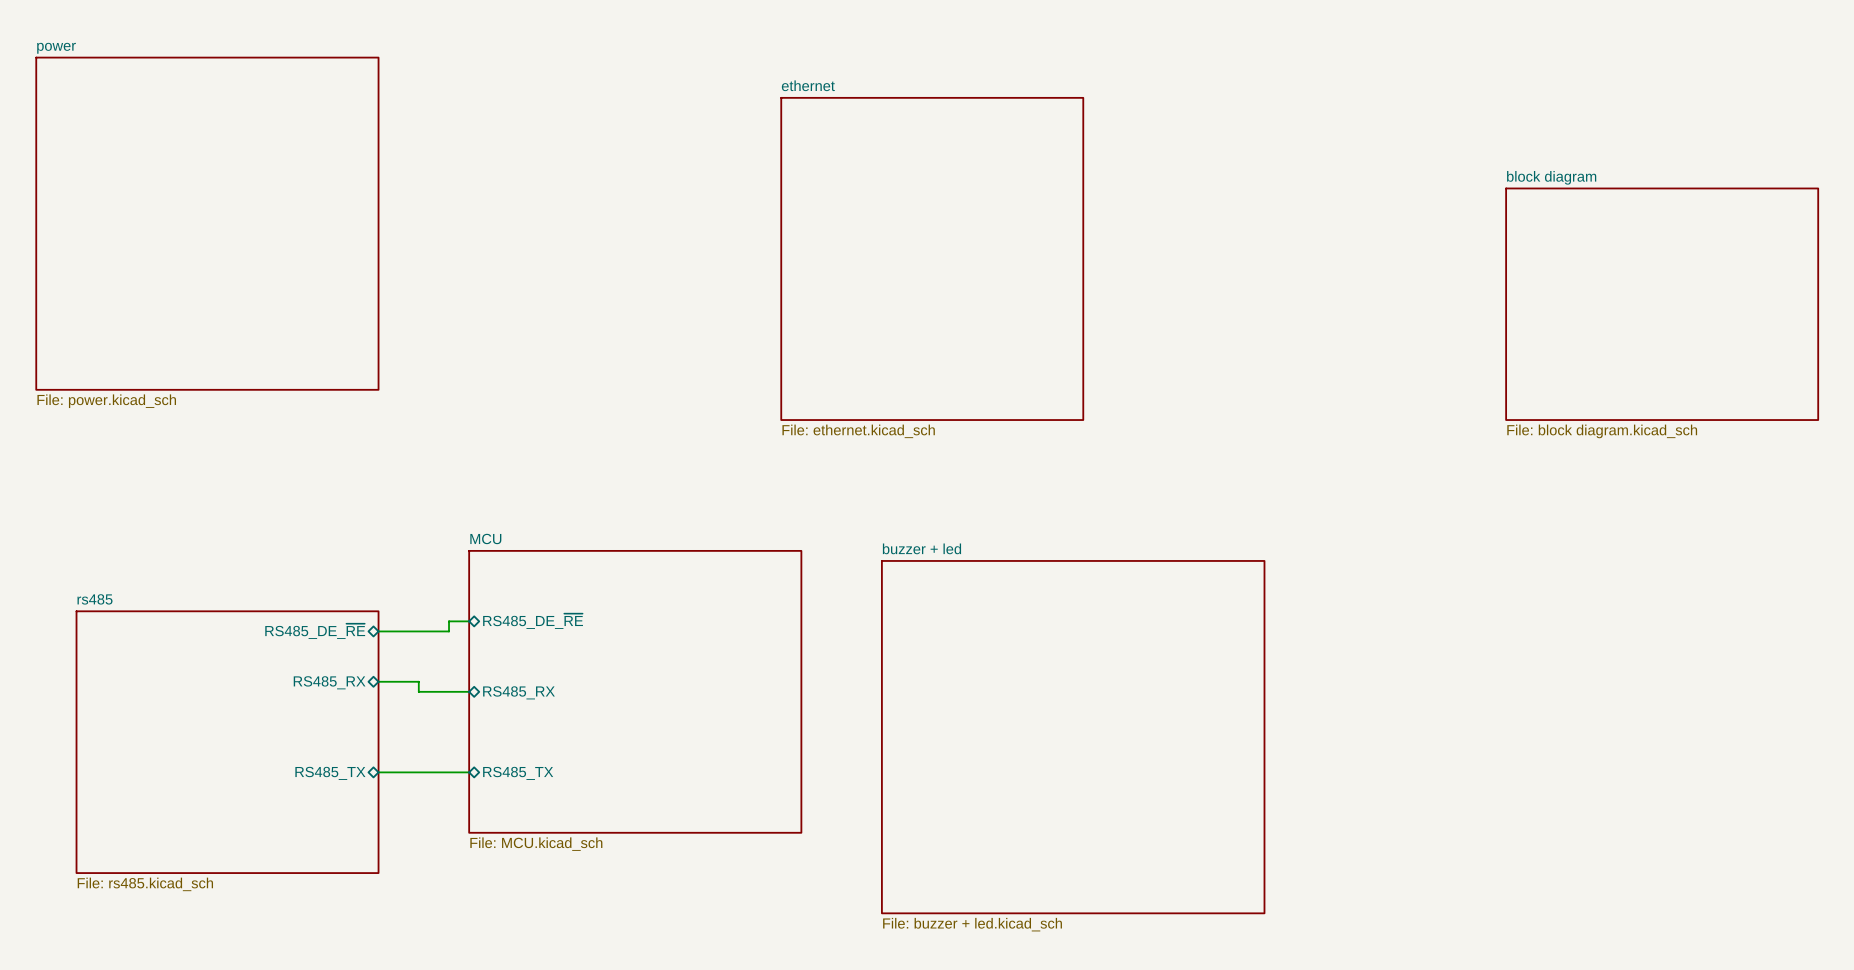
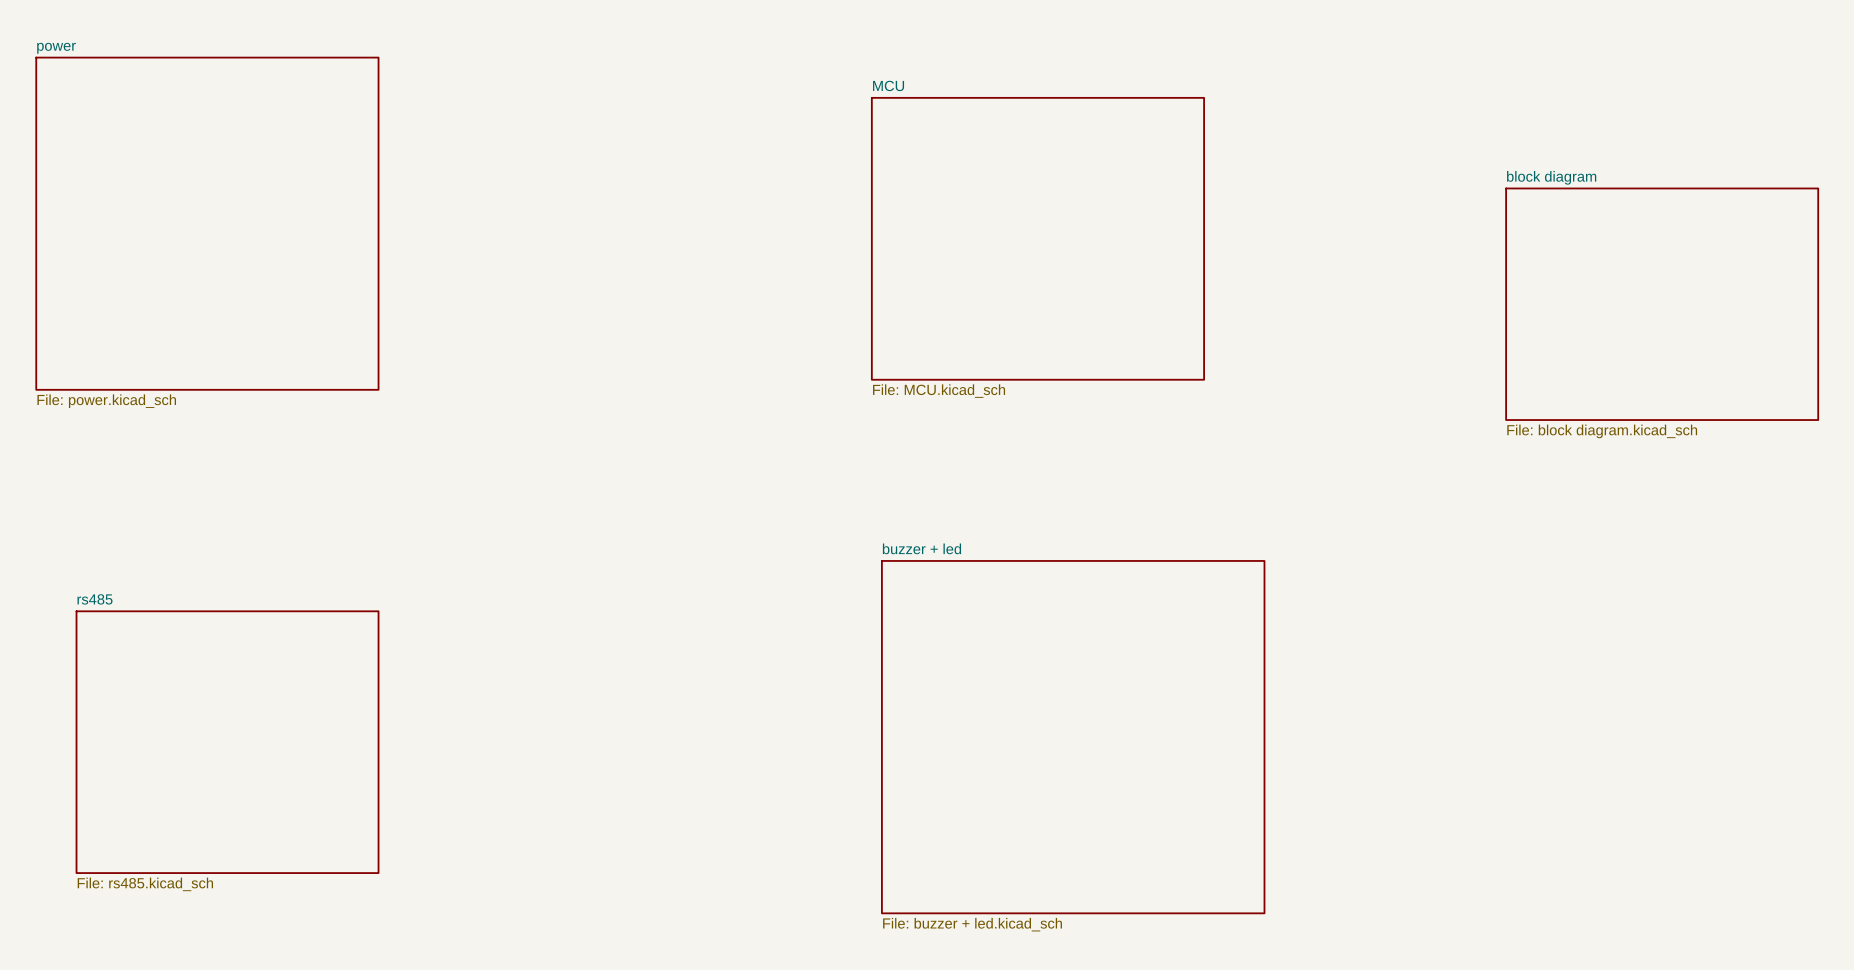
sheet MCU: none -> File: MCU.kicad_sch (1037, 238)
sheet ethernet: File: ethernet.kicad_sch (932, 258) -> none
wire: (469, 621) (449, 621) (449, 631) (378, 631) -> none
sheet pin: RS485_DE_~{RE} (533, 621) -> none
sheet pin: RS485_DE_~{RE} (315, 631) -> none
wire: (378, 681) (418, 681) (418, 691) (469, 691) -> none
sheet pin: RS485_RX (329, 682) -> none
sheet MCU: File: MCU.kicad_sch (635, 691) -> none
sheet pin: RS485_RX (518, 692) -> none
wire: (378, 772) (469, 772) -> none
sheet pin: RS485_TX (330, 773) -> none
sheet pin: RS485_TX (518, 773) -> none

